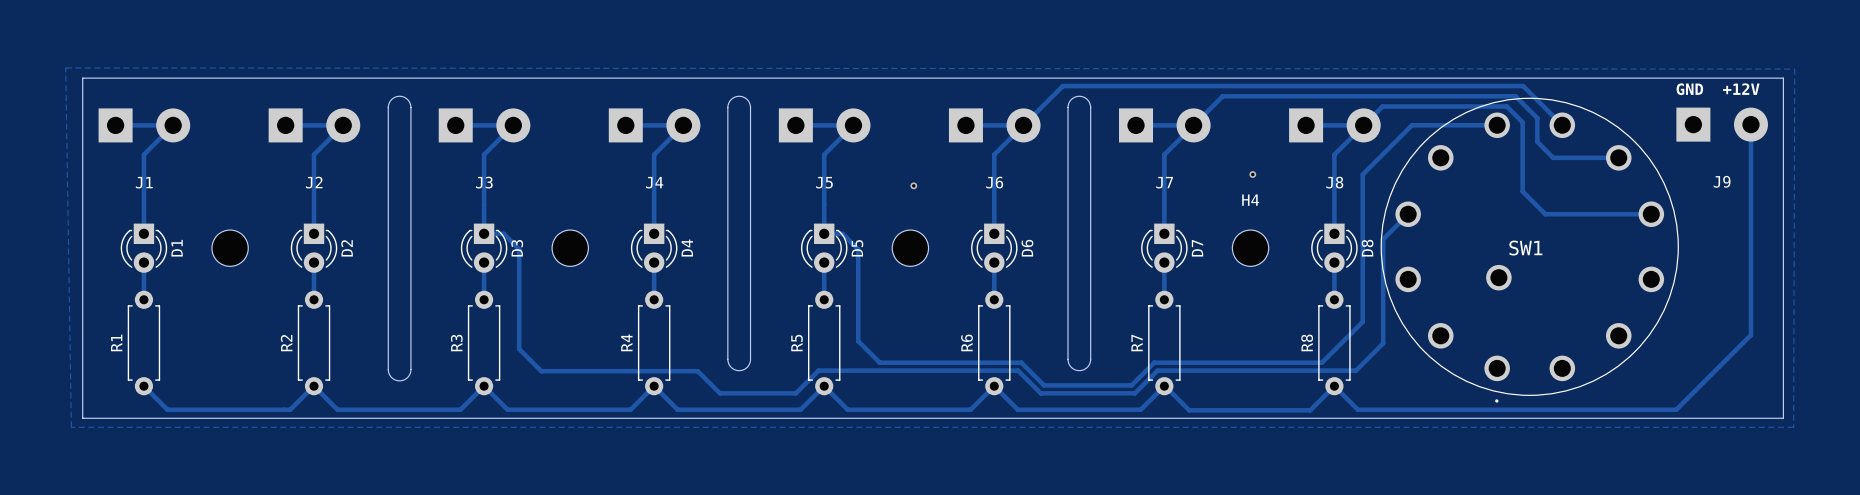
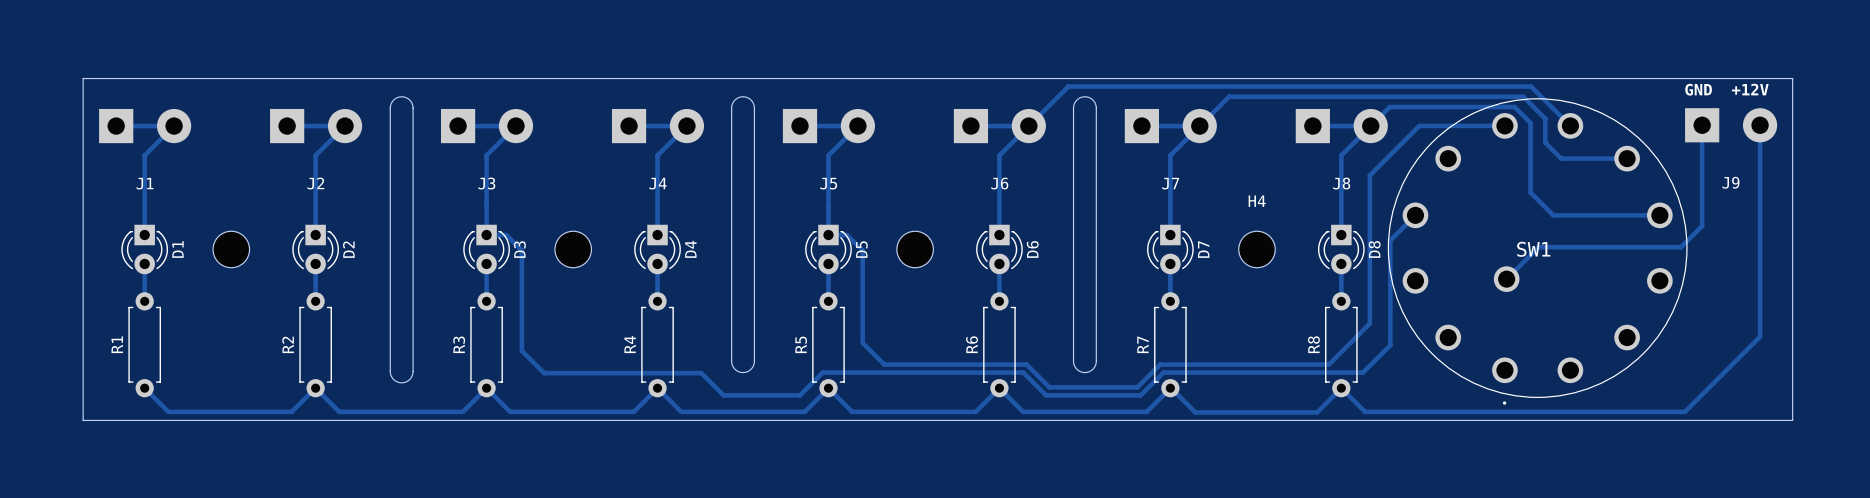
zone outline: (65, 67) (1794, 69) (1793, 427) (71, 427) (65, 67) -> none
track: none -> (1702, 125) (1702, 226) (1680, 247) (1538, 247) (1506, 279)
via: (1252, 174) -> none
via: (913, 185) -> none

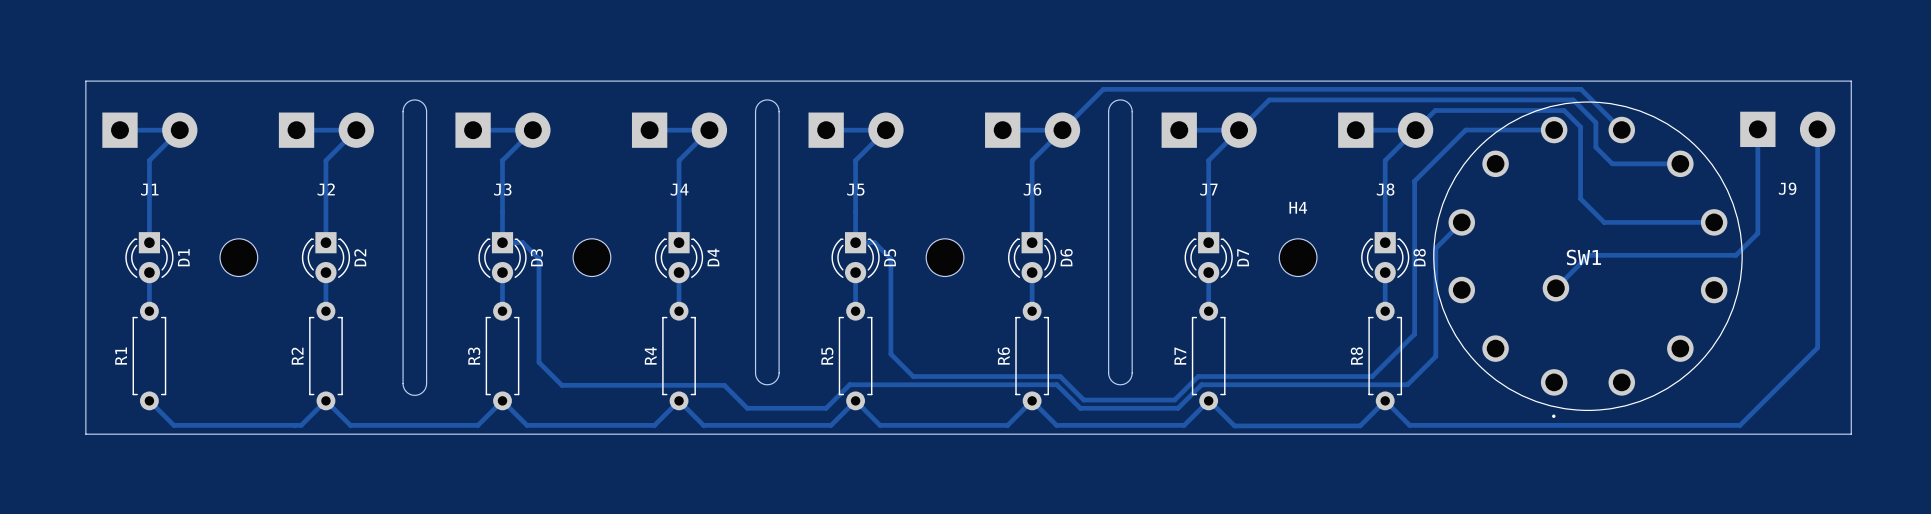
text: GND +12V (1726, 89) -> none

